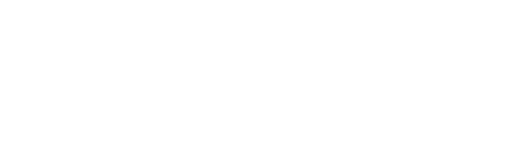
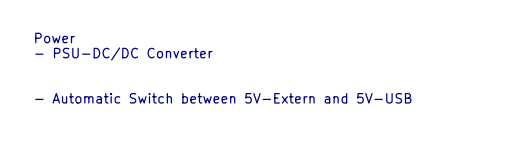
text: none -> Power (54, 37)
text: none -> - PSU-DC/DC Converter (123, 53)
text: none -> - Automatic Switch between 5V-Extern and 5V-USB (223, 98)

